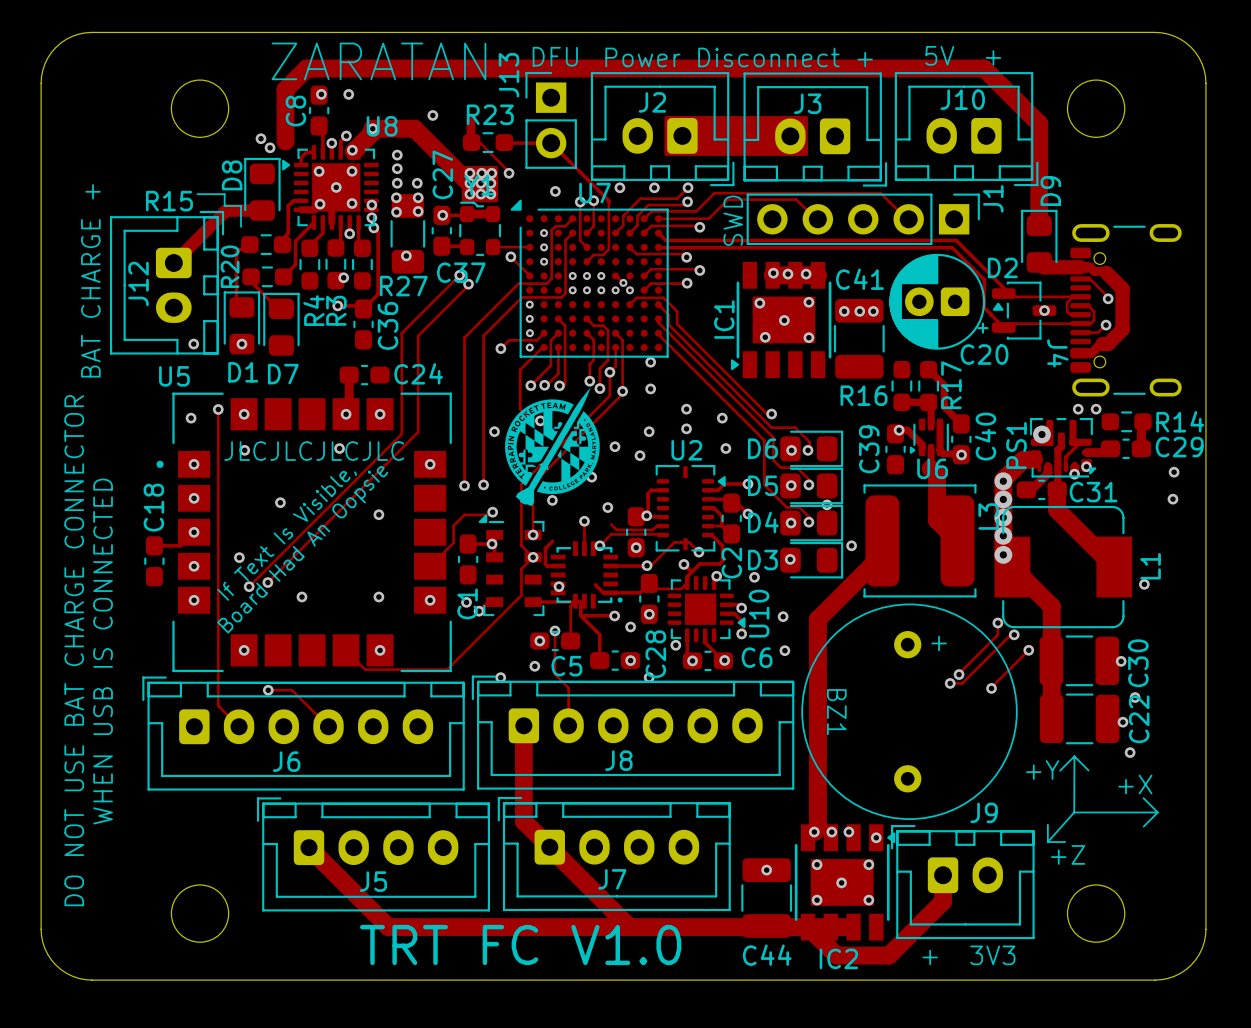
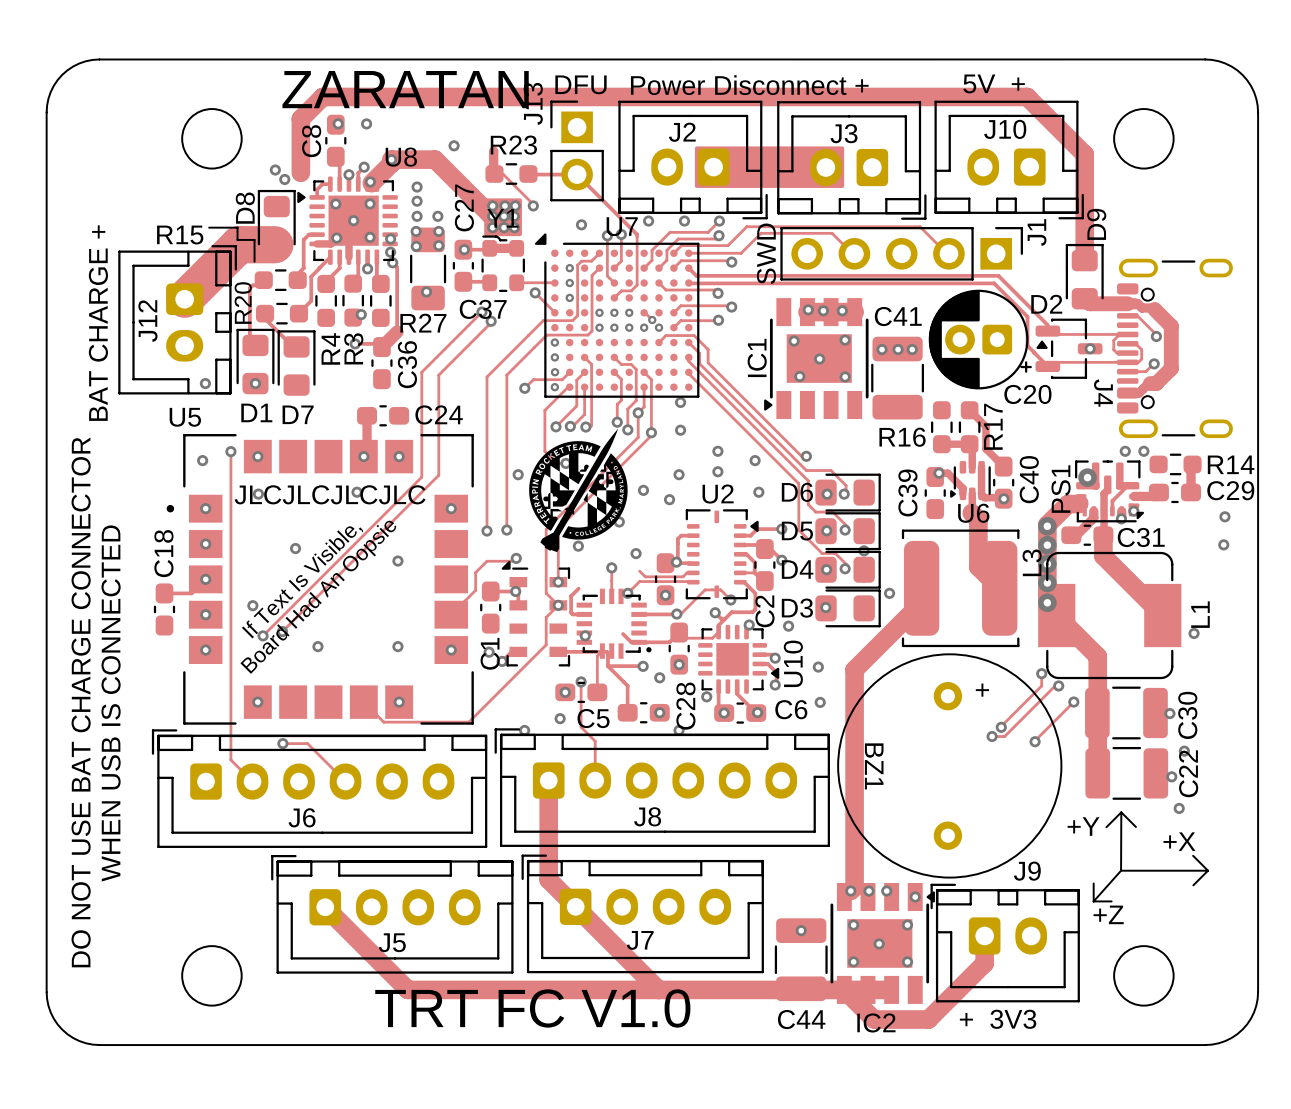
track width: thin (260, 210) (226, 210) (173, 262) -> thick (274, 244) (239, 244) (184, 299)
track width: thin (378, 294) (363, 308) -> thick (397, 331) (381, 347)

